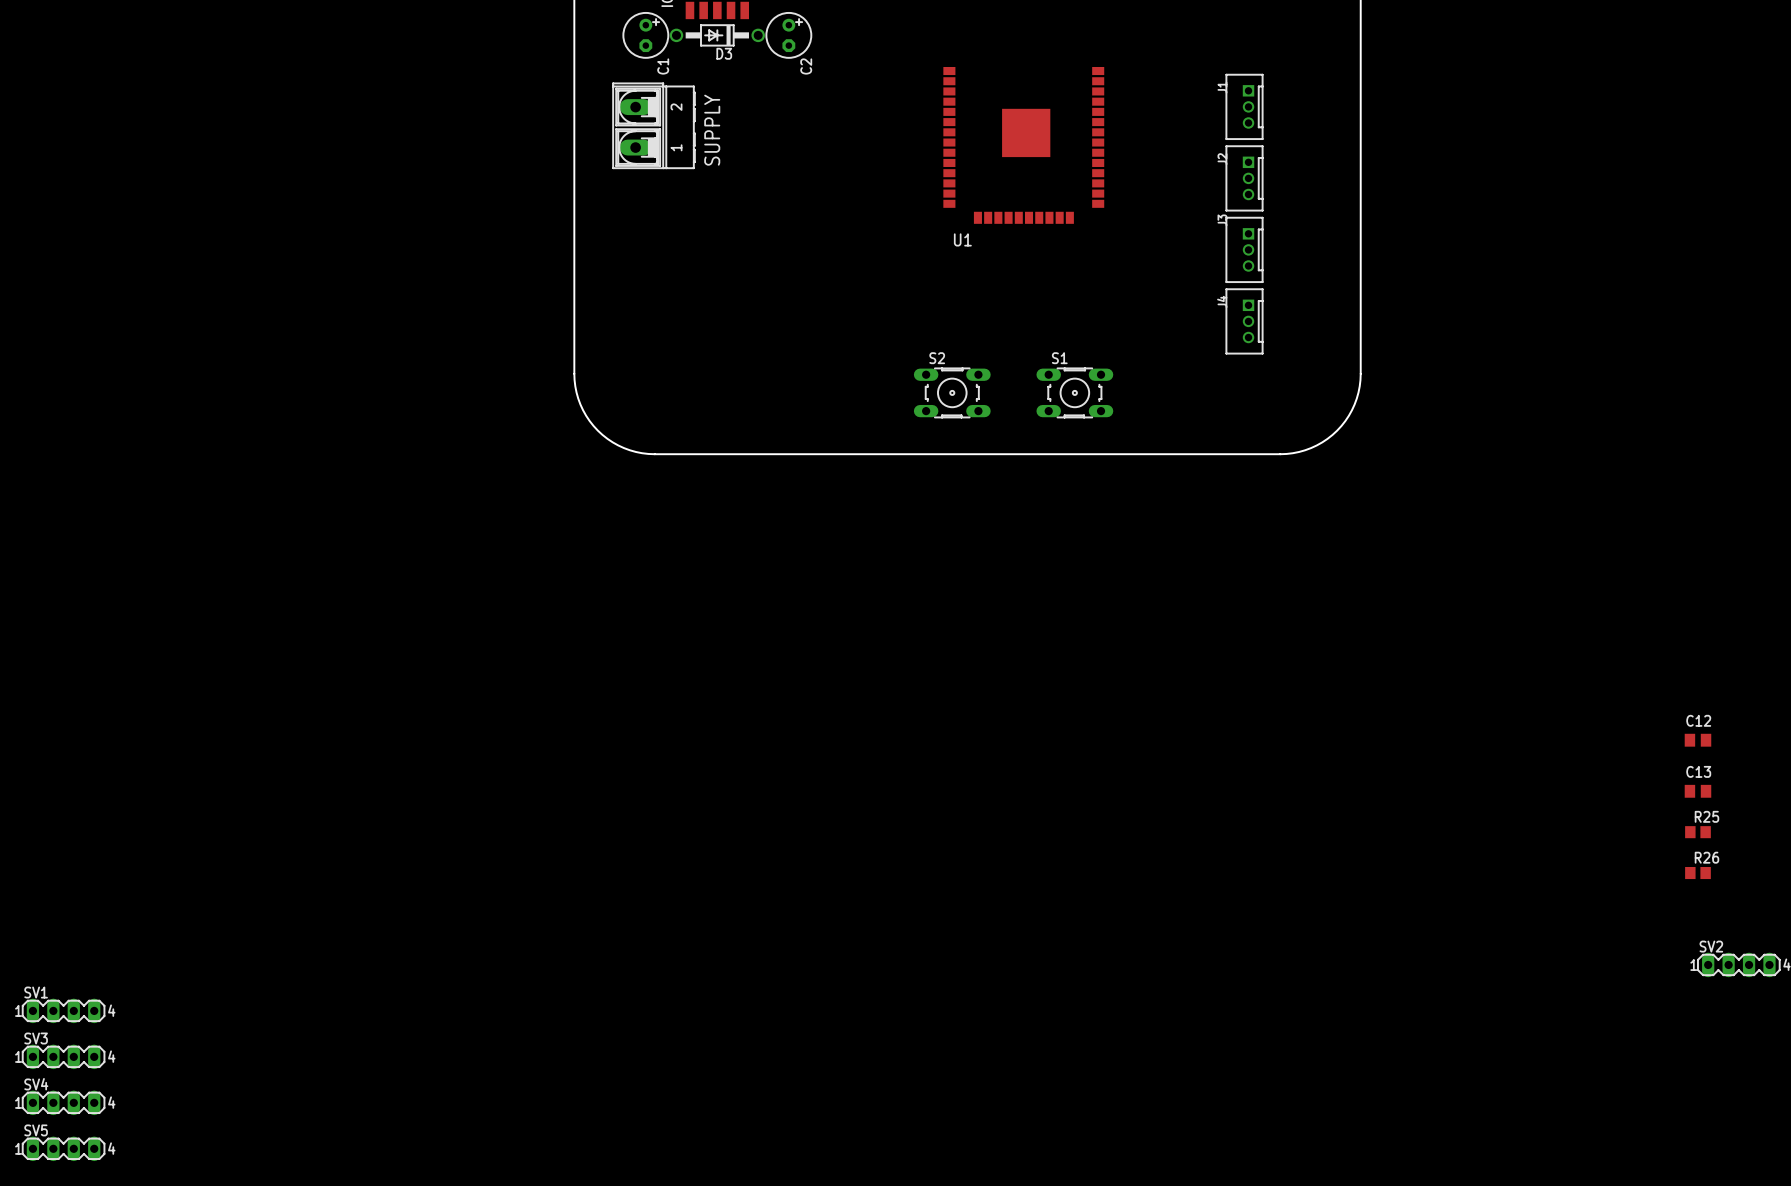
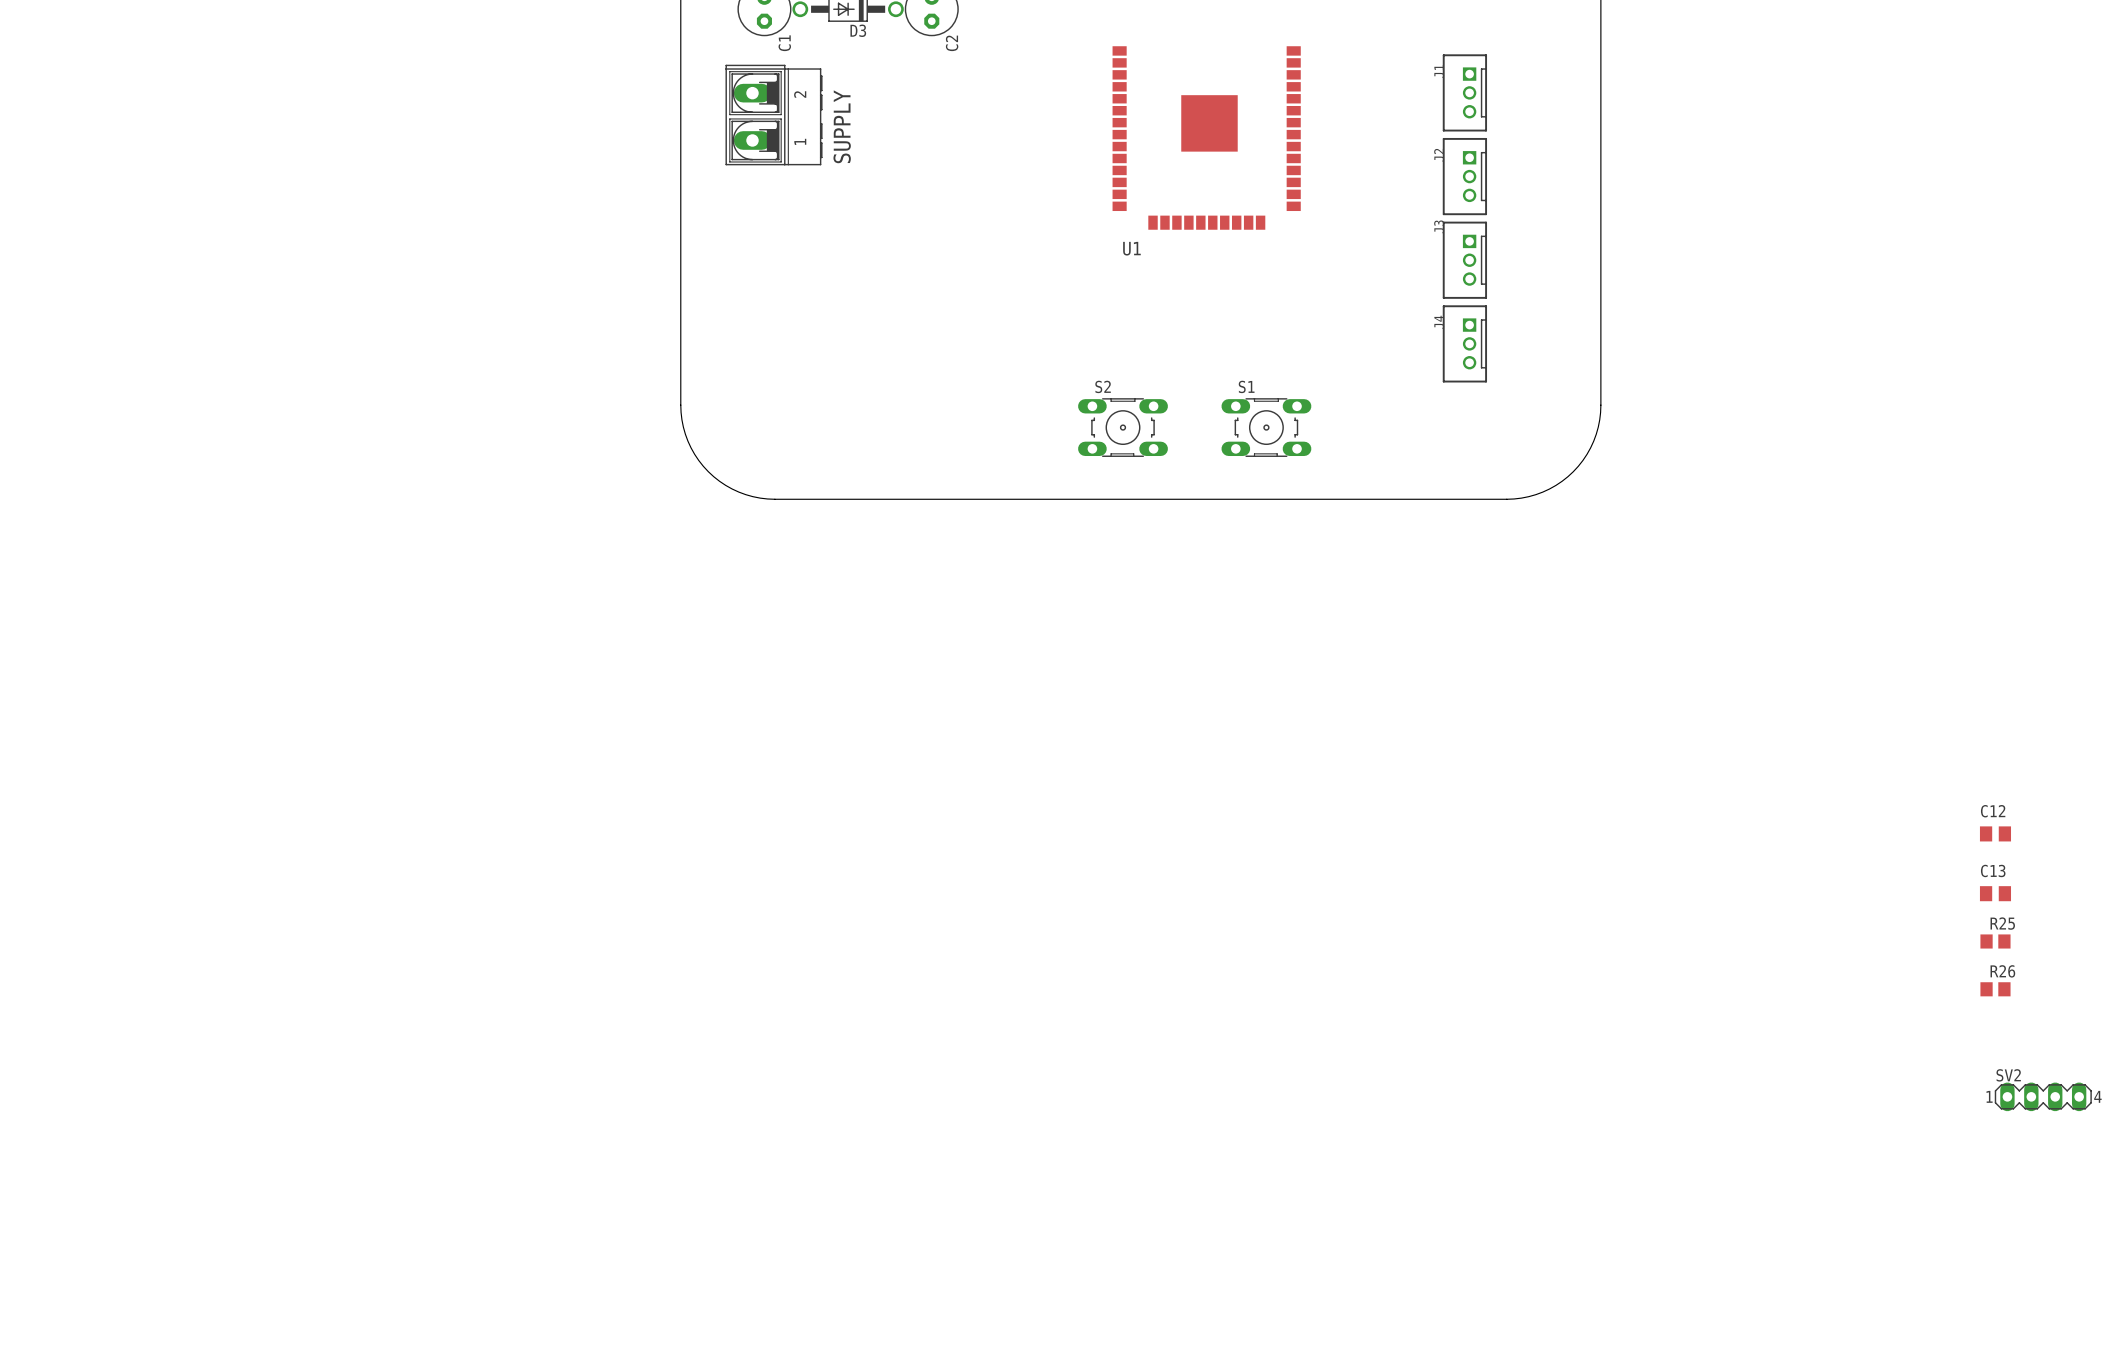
SV1: (63, 1010) -> none
SV3: (63, 1056) -> none
SV4: (63, 1102) -> none
SV5: (63, 1148) -> none

